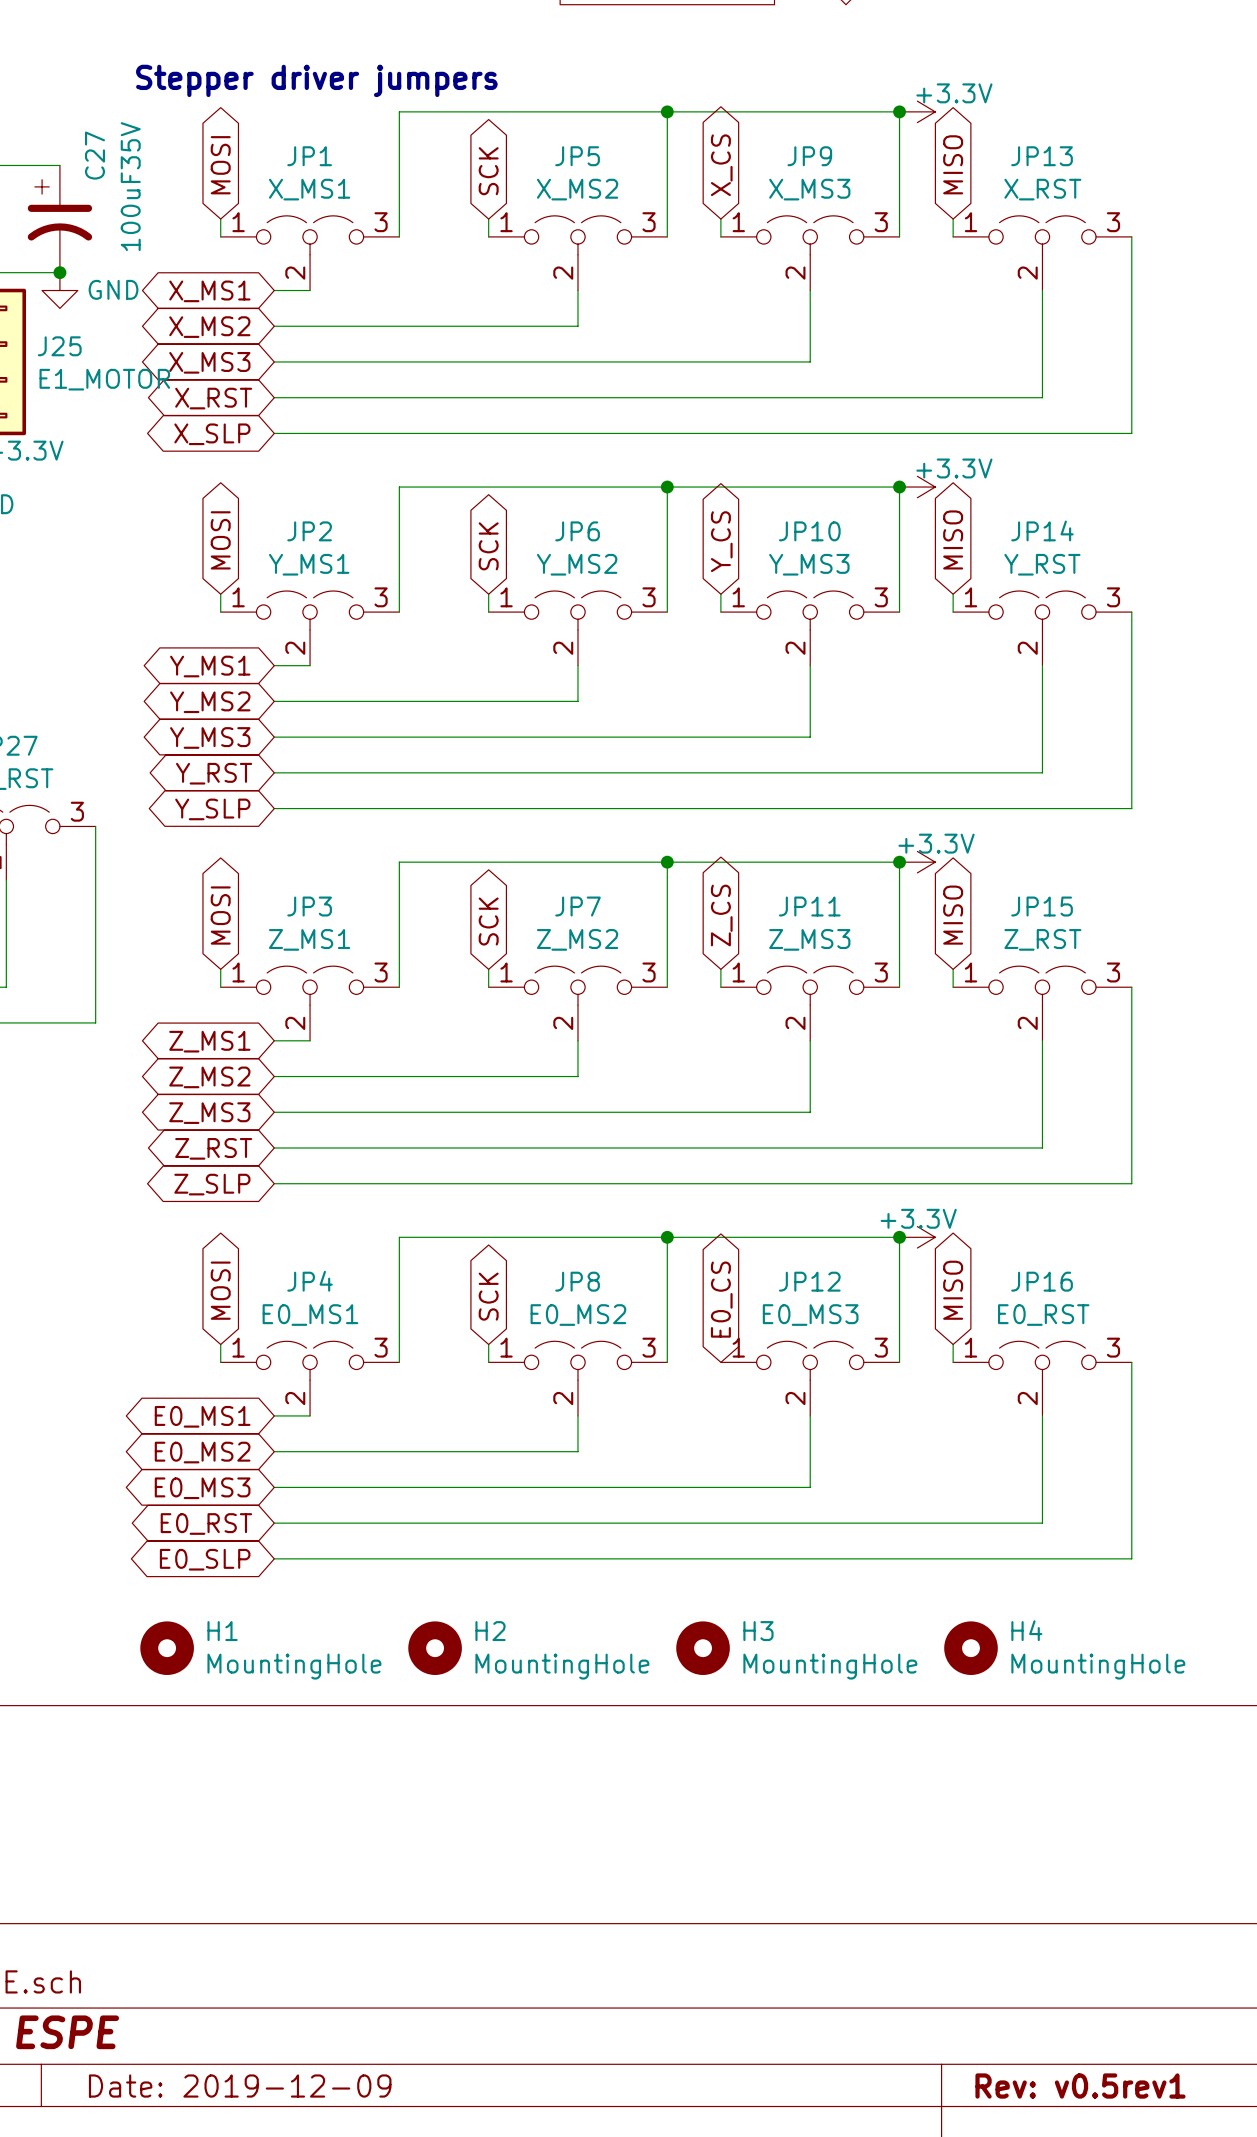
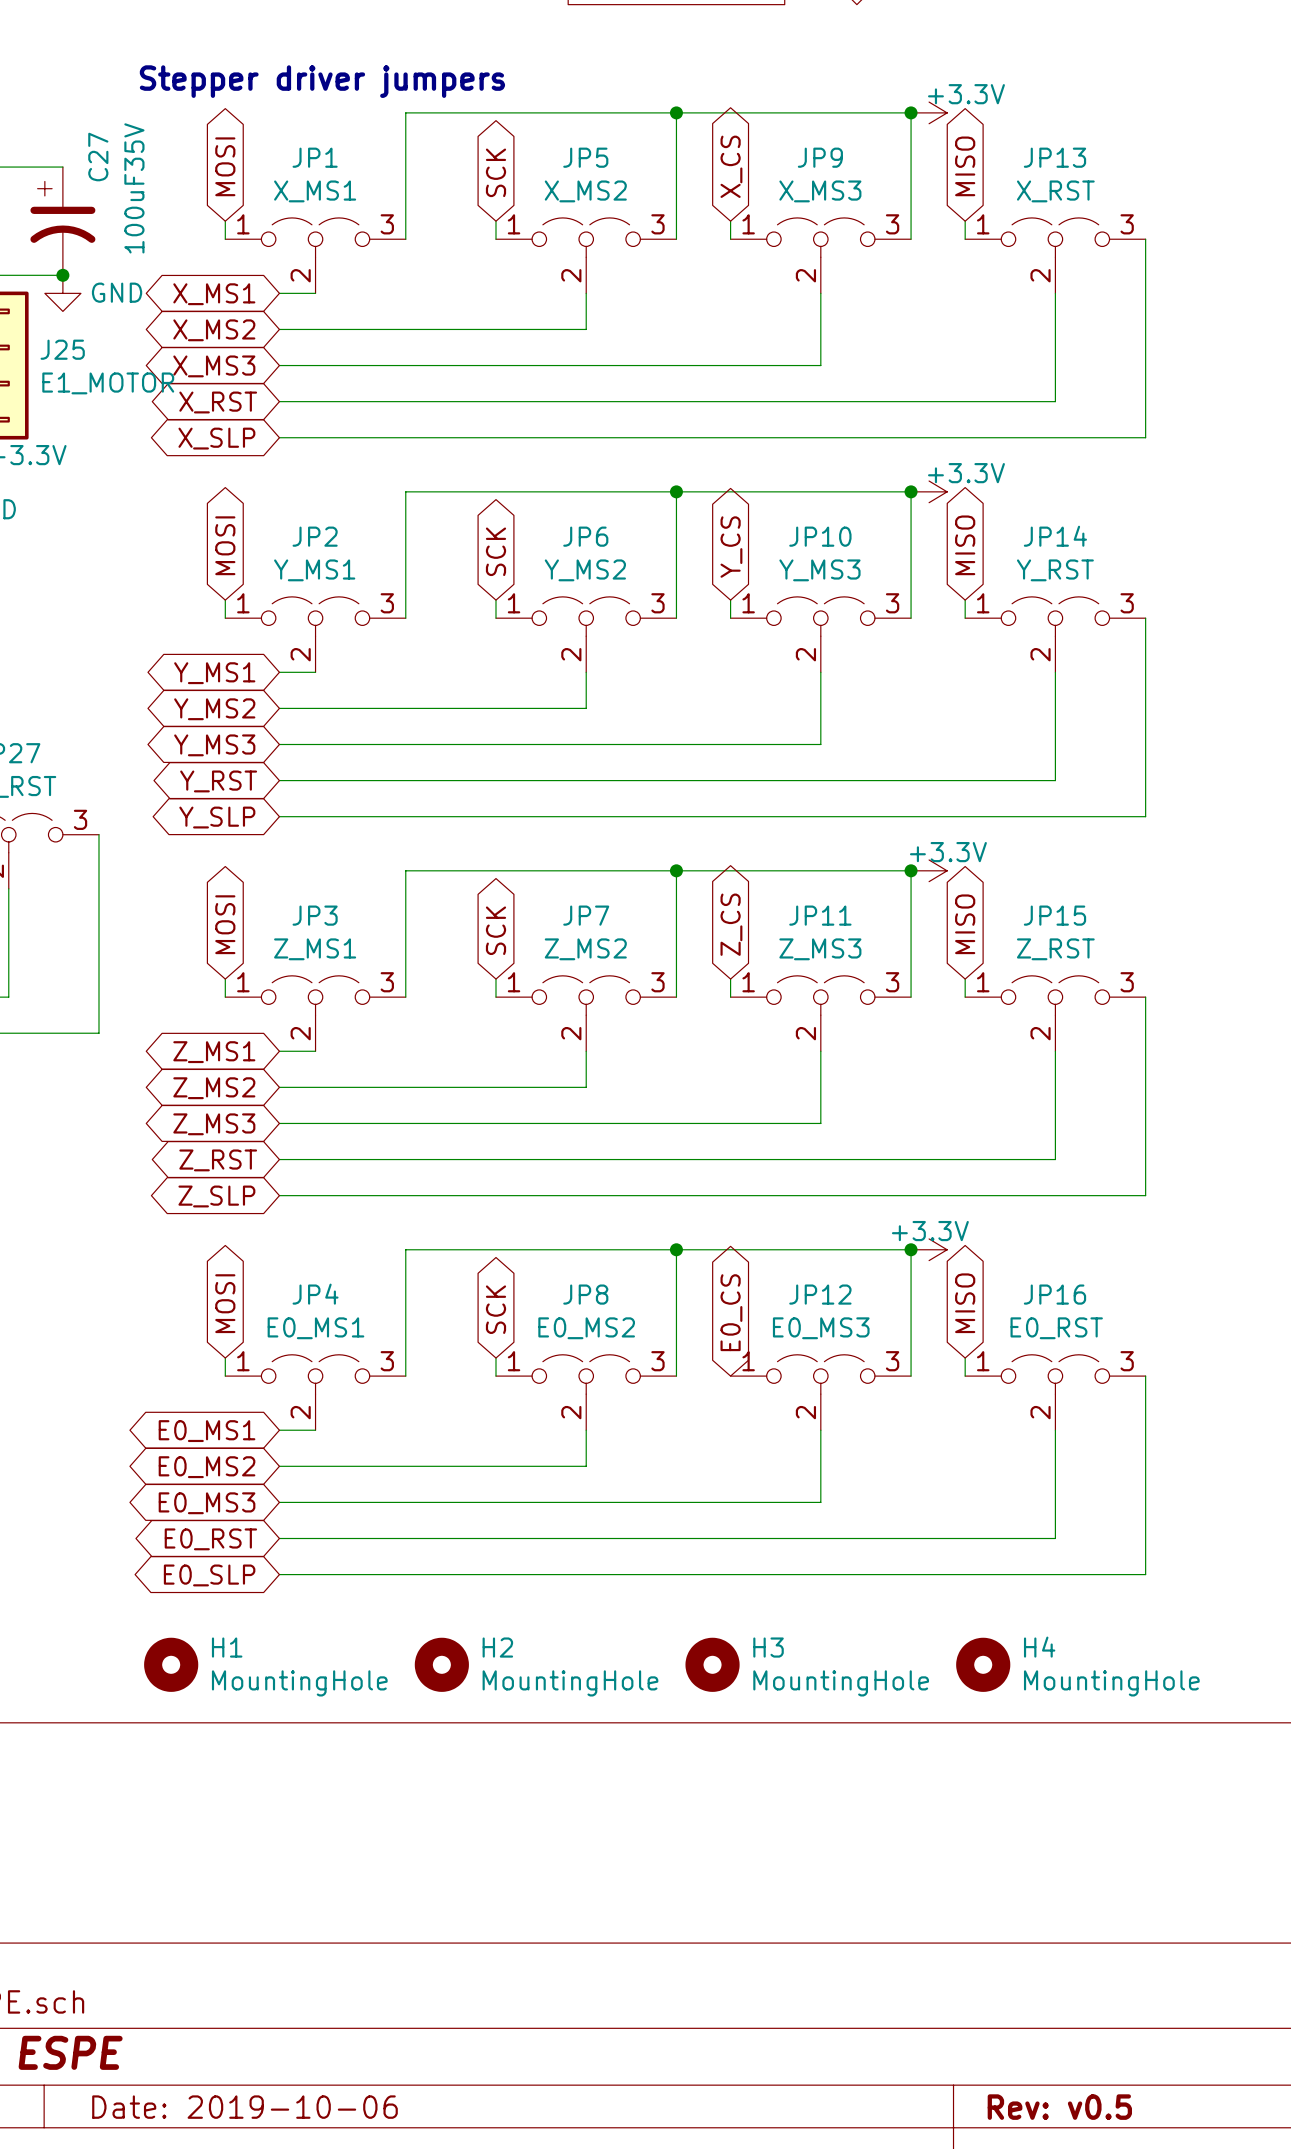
title block: Date: 2019-12-09 (240, 2086) -> Date: 2019-10-06 (244, 2107)
title block: Rev: v0.5rev1 (1080, 2086) -> Rev: v0.5 (1059, 2107)

